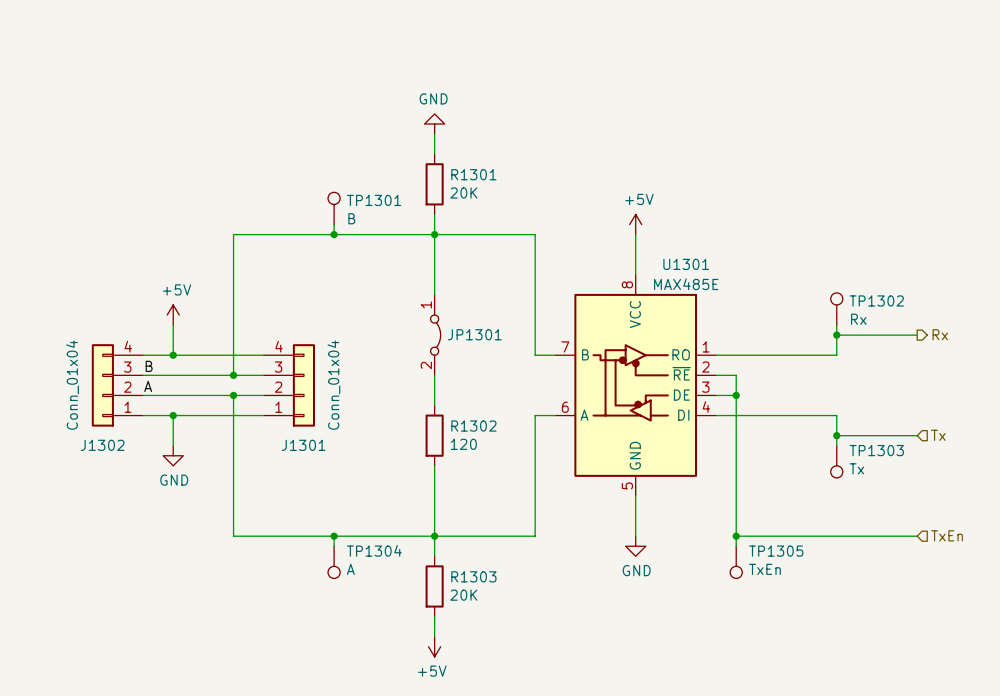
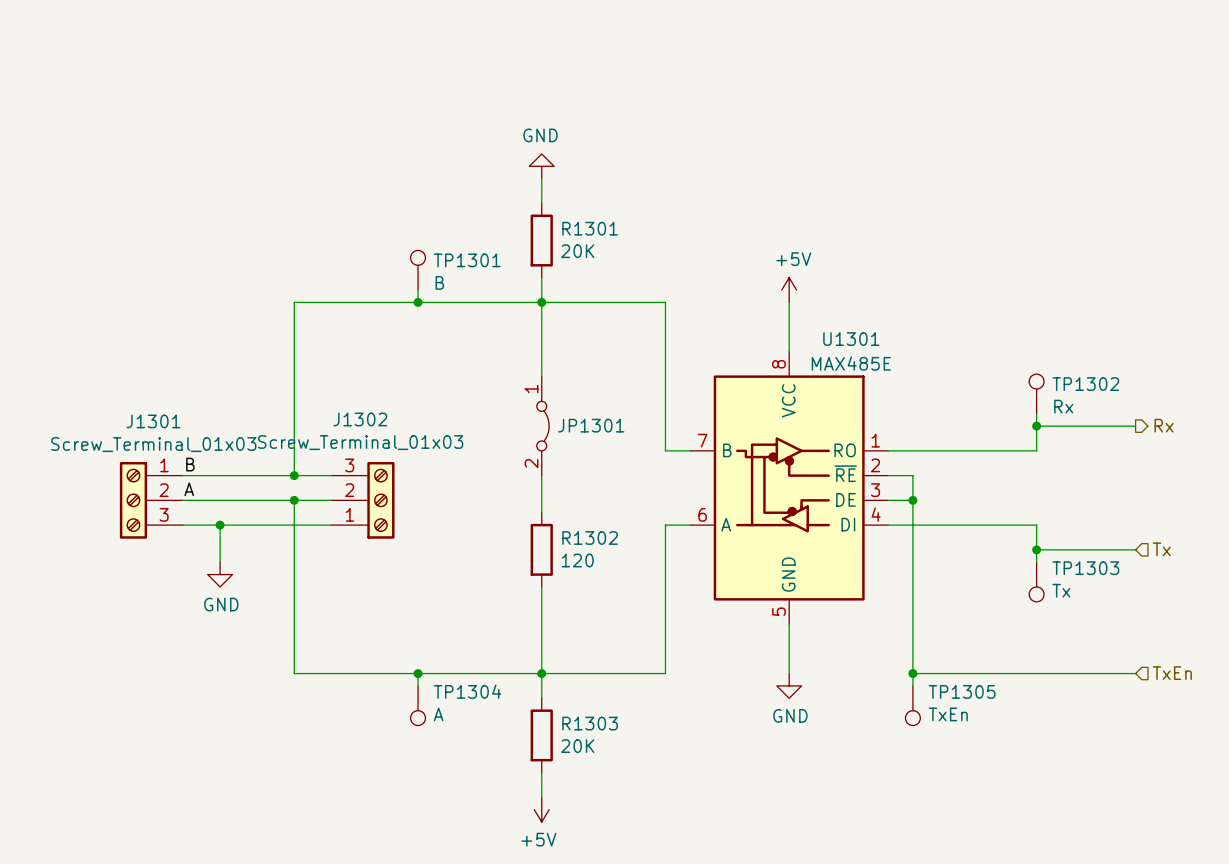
power symbol: +5V (173, 315) -> none
wire: (173, 325) (173, 355) -> none
J1302 symbol: [91, 344, 144, 427] -> [331, 462, 395, 539]
J1301 symbol: [263, 344, 315, 427] -> [119, 462, 183, 539]
wire: (143, 355) (263, 355) -> none
junction: (173, 355) -> none
J1302 value: Conn_01x04 (72, 385) -> Screw_Terminal_01x03 (360, 442)
J1301 value: Conn_01x04 (333, 385) -> Screw_Terminal_01x03 (153, 444)
J1302 name position: J1302 (102, 445) -> J1302 (360, 419)
J1301 name position: J1301 (303, 445) -> J1301 (153, 421)

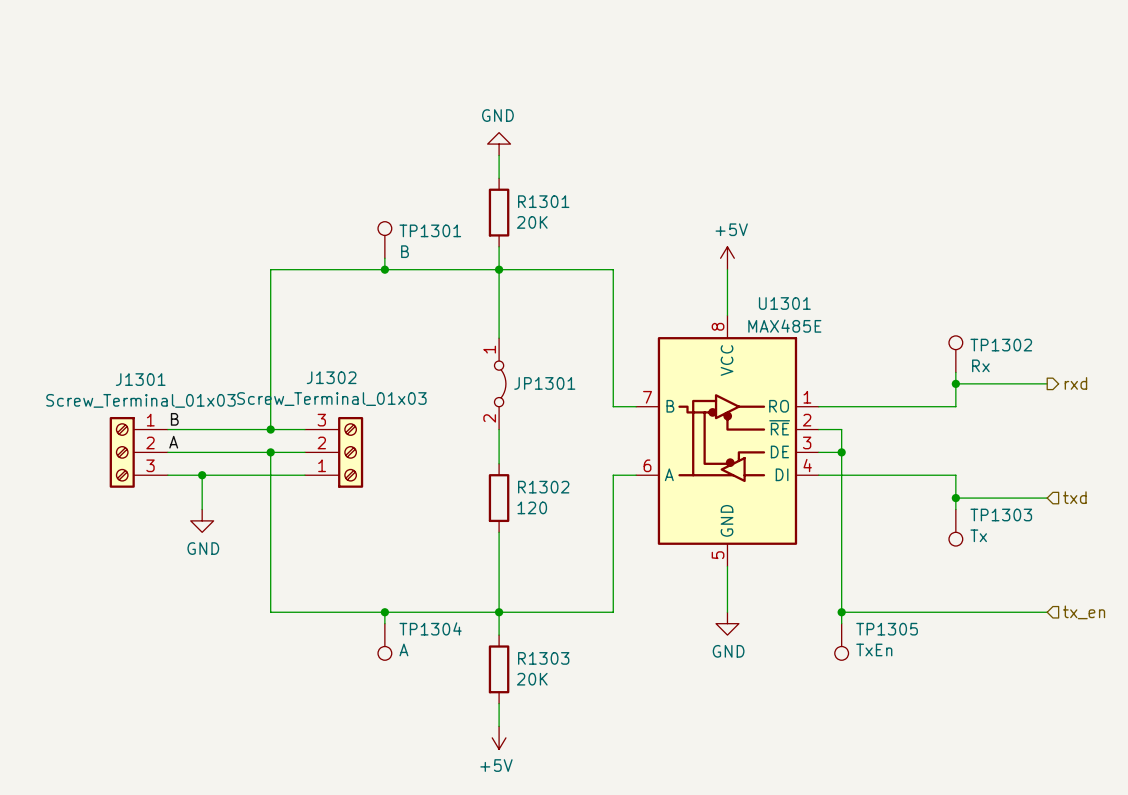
hierarchical label: Rx (1164, 425) -> rxd (1075, 383)
hierarchical label: Tx (1161, 549) -> txd (1074, 497)
hierarchical label: TxEn (1172, 673) -> tx_en (1084, 612)

